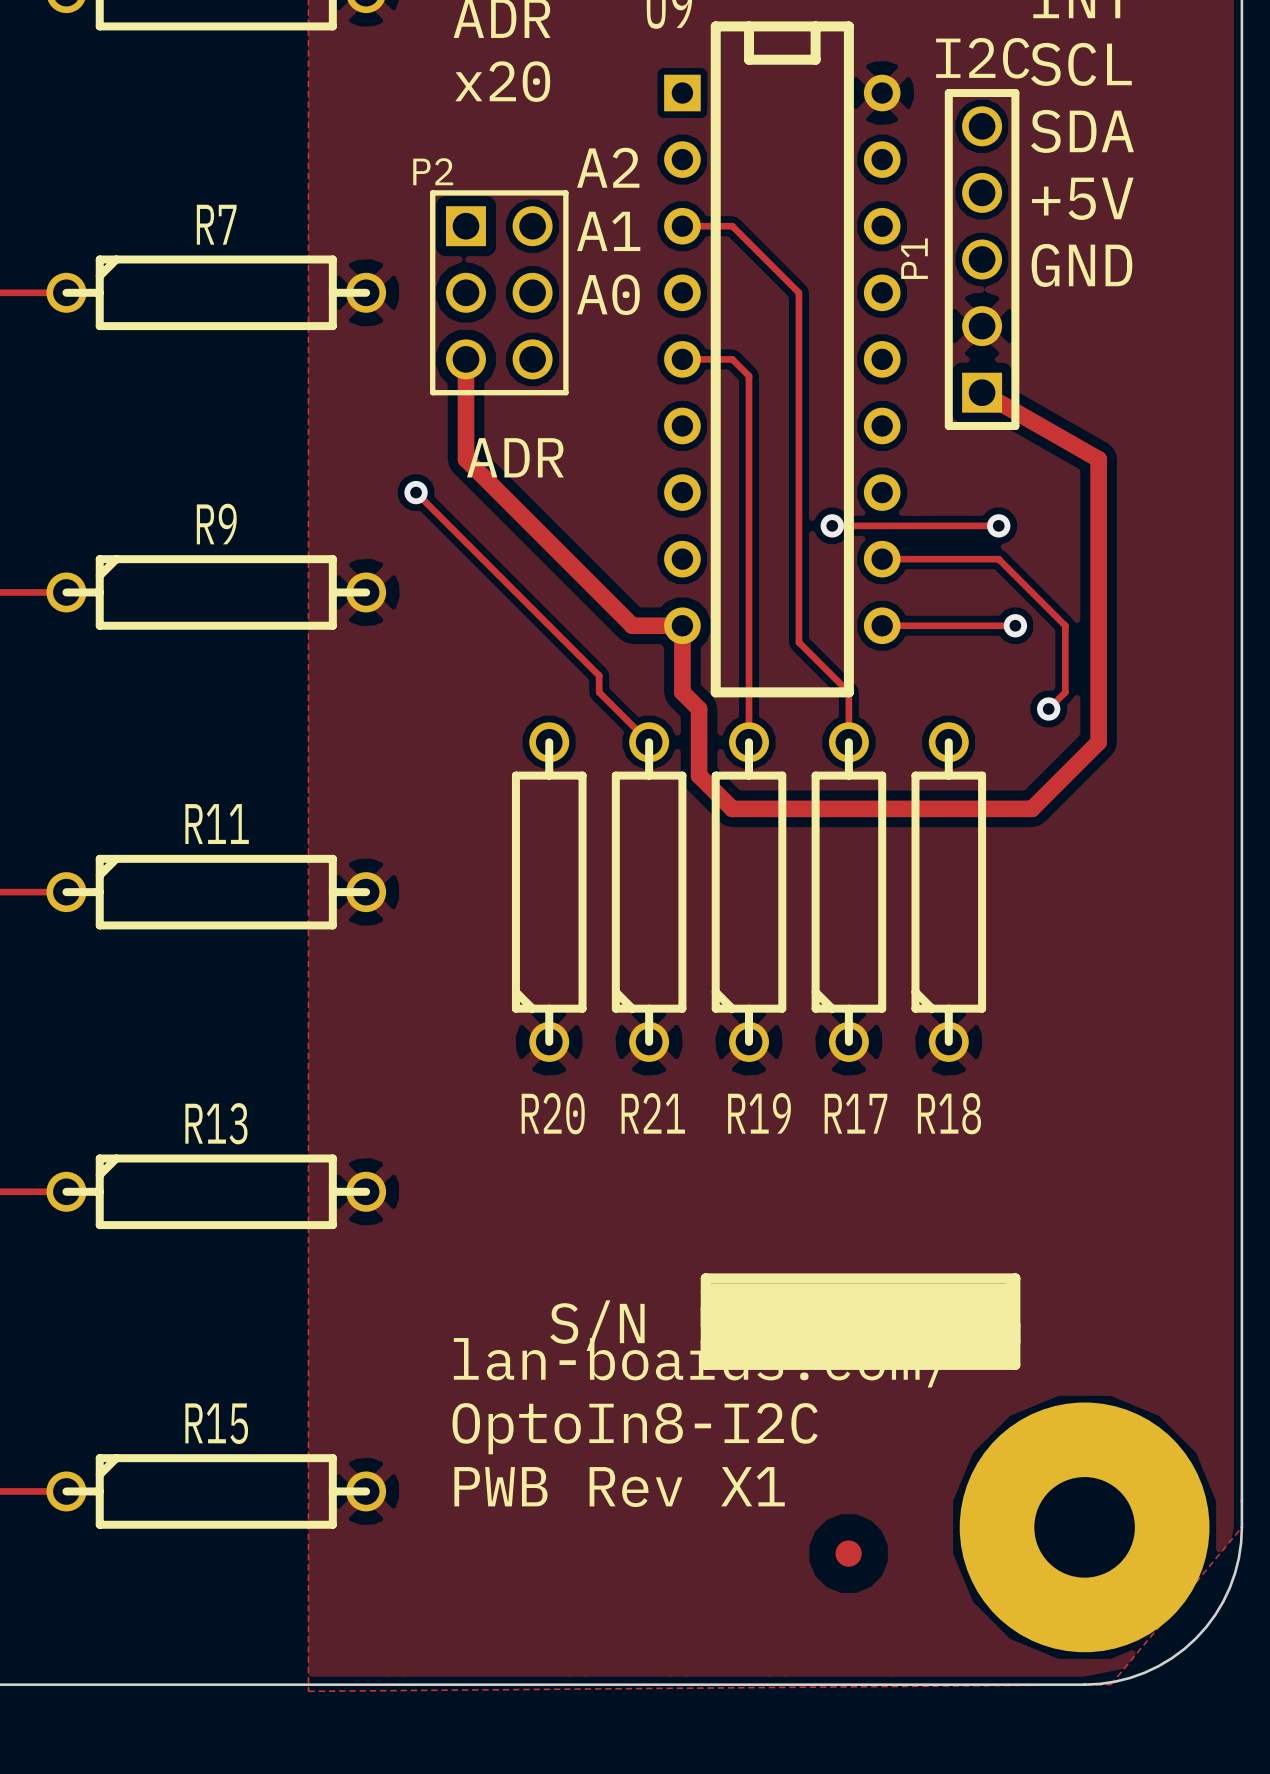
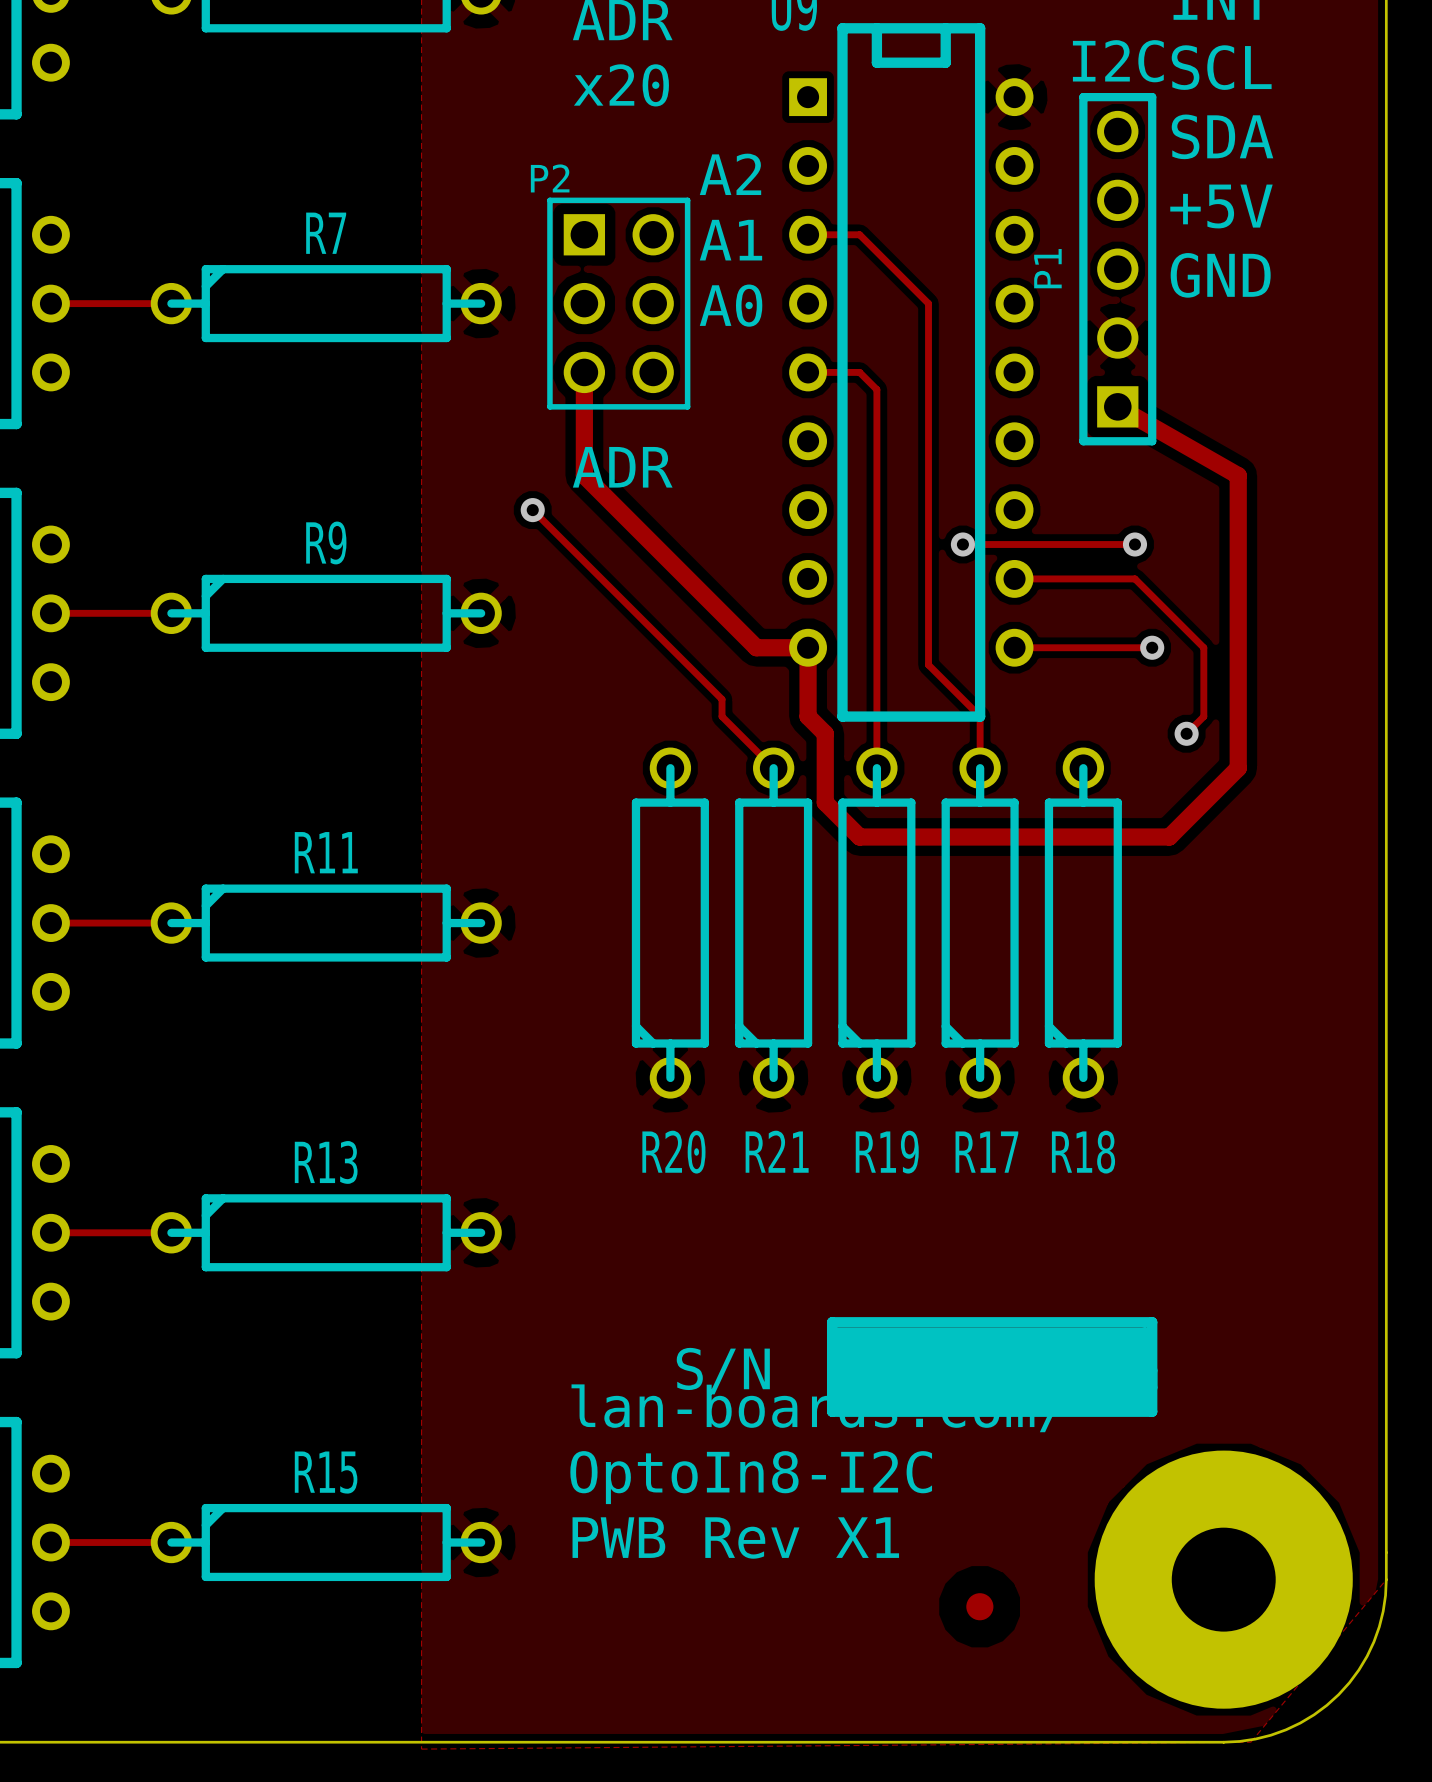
text position: ADR (515, 457) -> ADR (622, 467)

